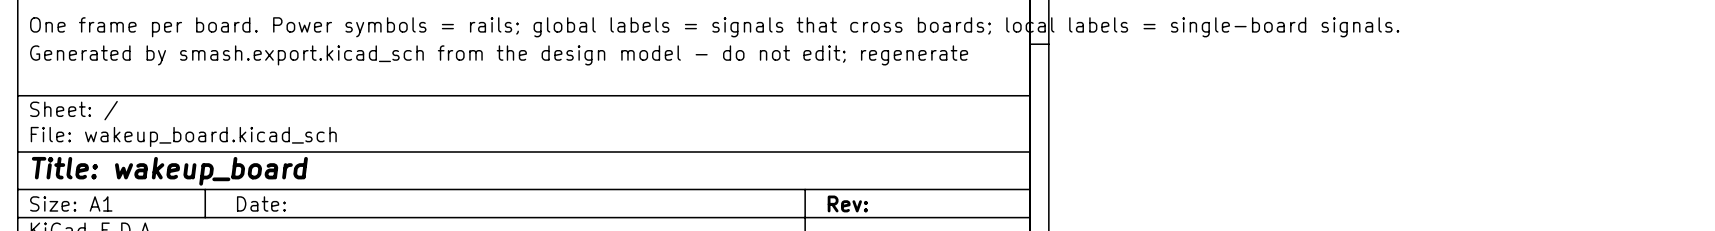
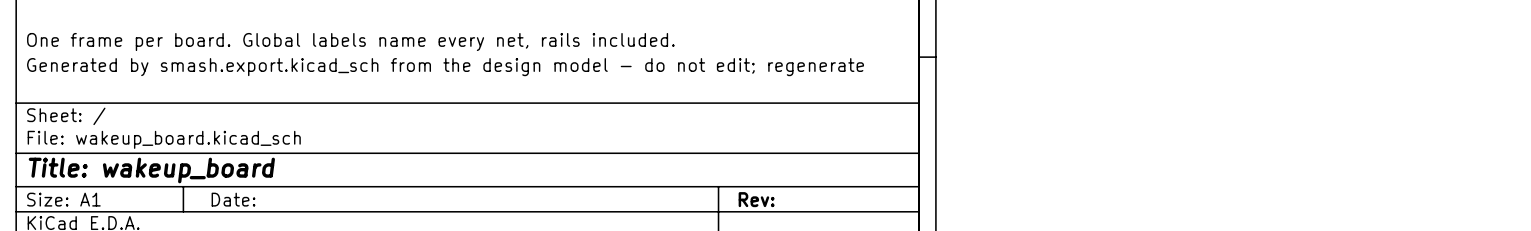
title block: One frame per board. Power symbols = rails; global labels = signals that cross boards; local labels = single-board signals. (714, 27) -> One frame per board. Global labels name every net, rails included. (350, 42)

